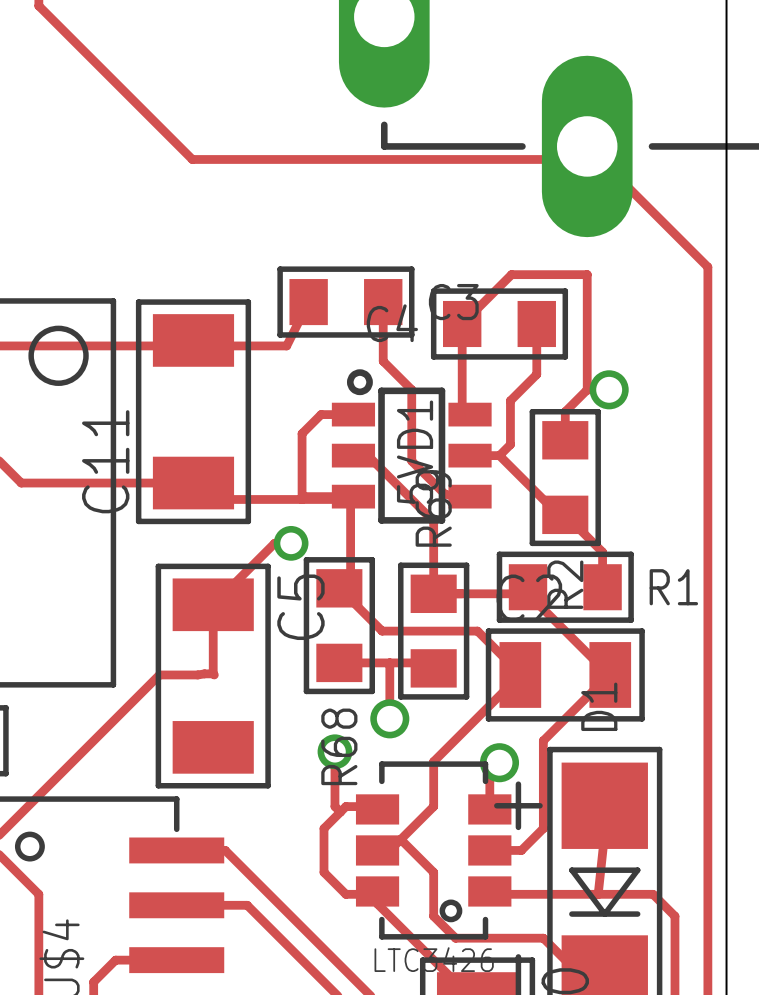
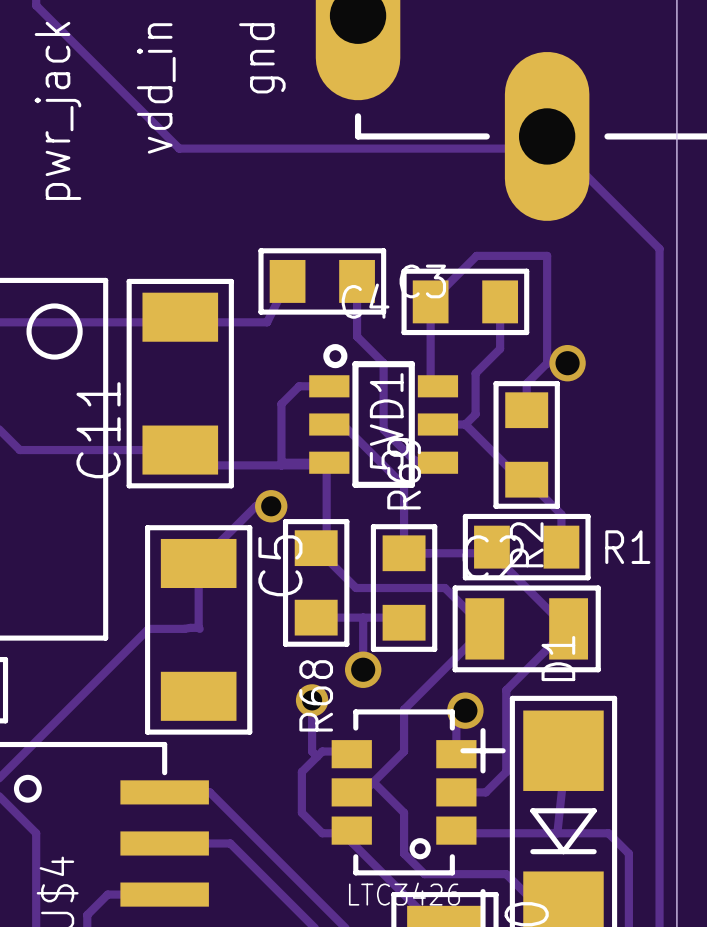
text: none -> gnd (262, 58)
text: none -> vdd_in (156, 88)
text: none -> pwr_jack (57, 110)

